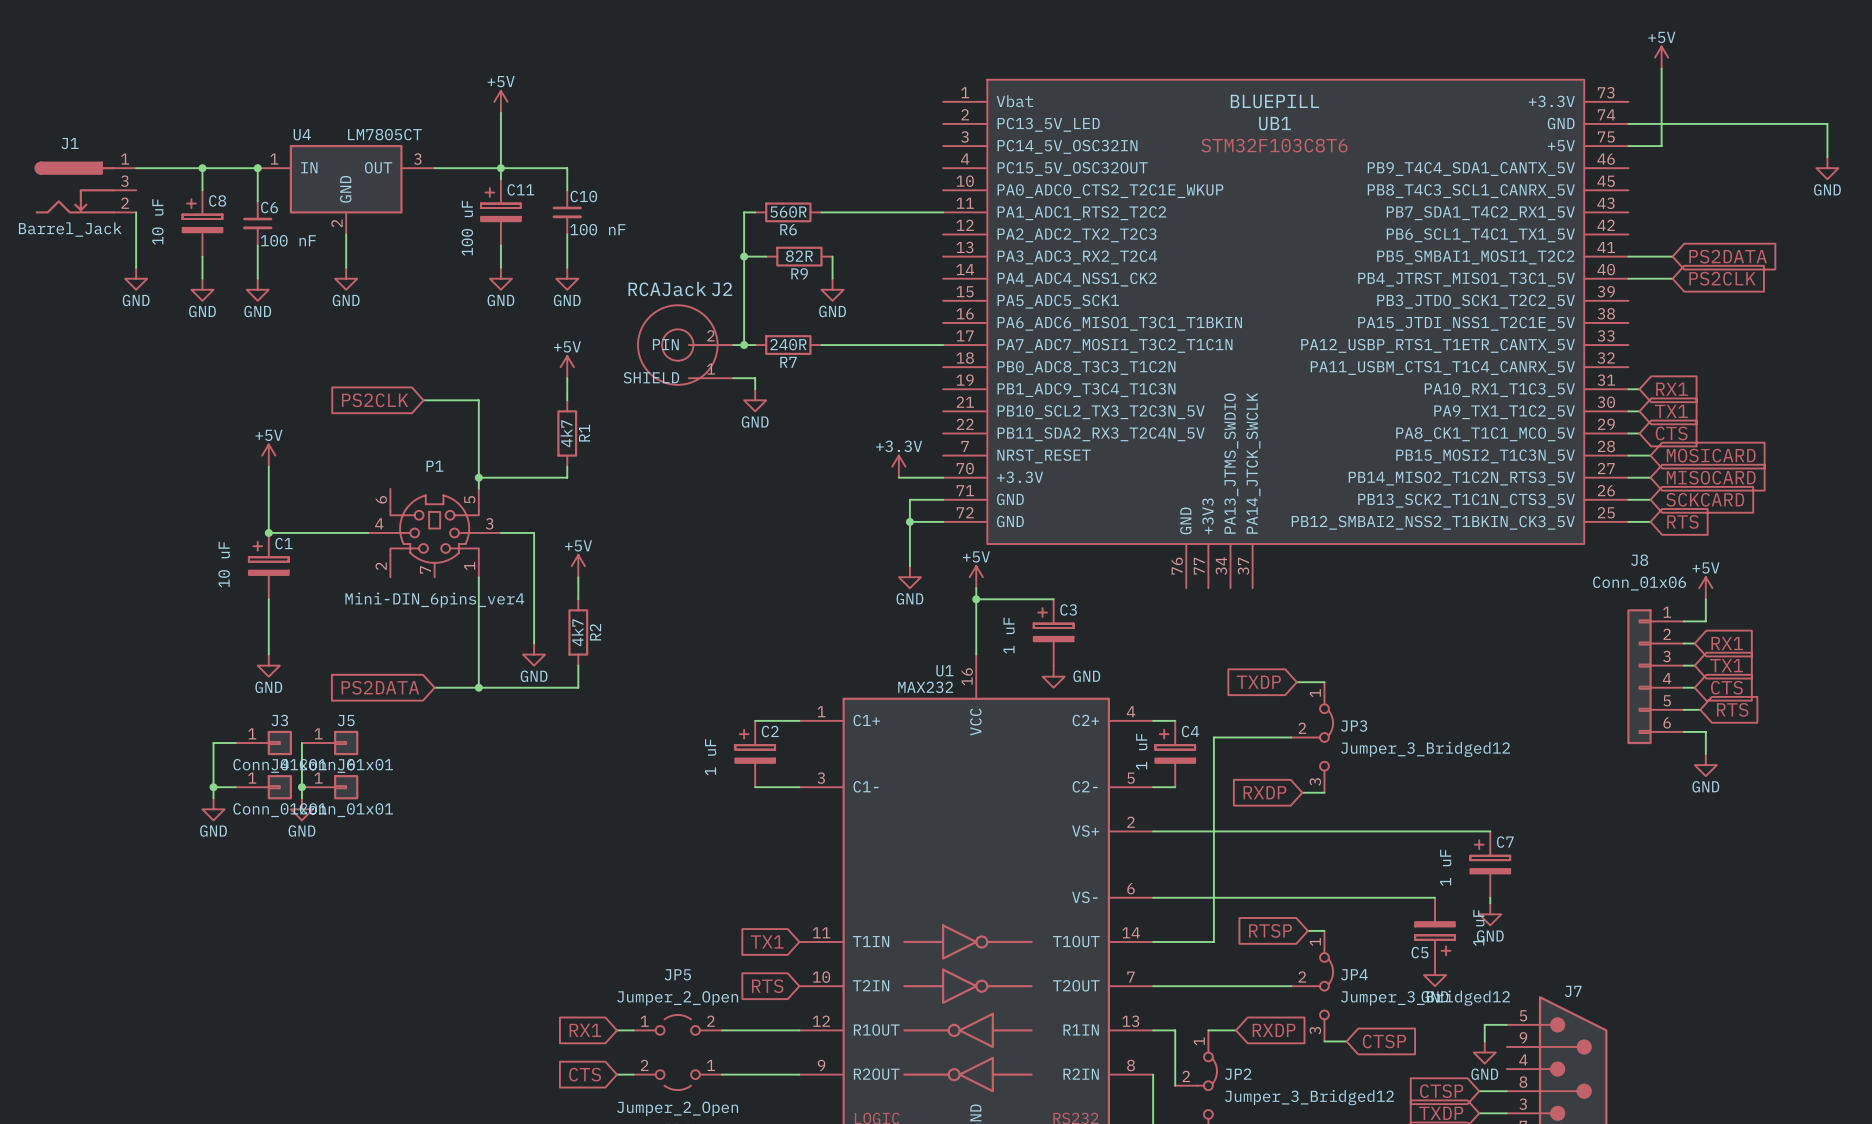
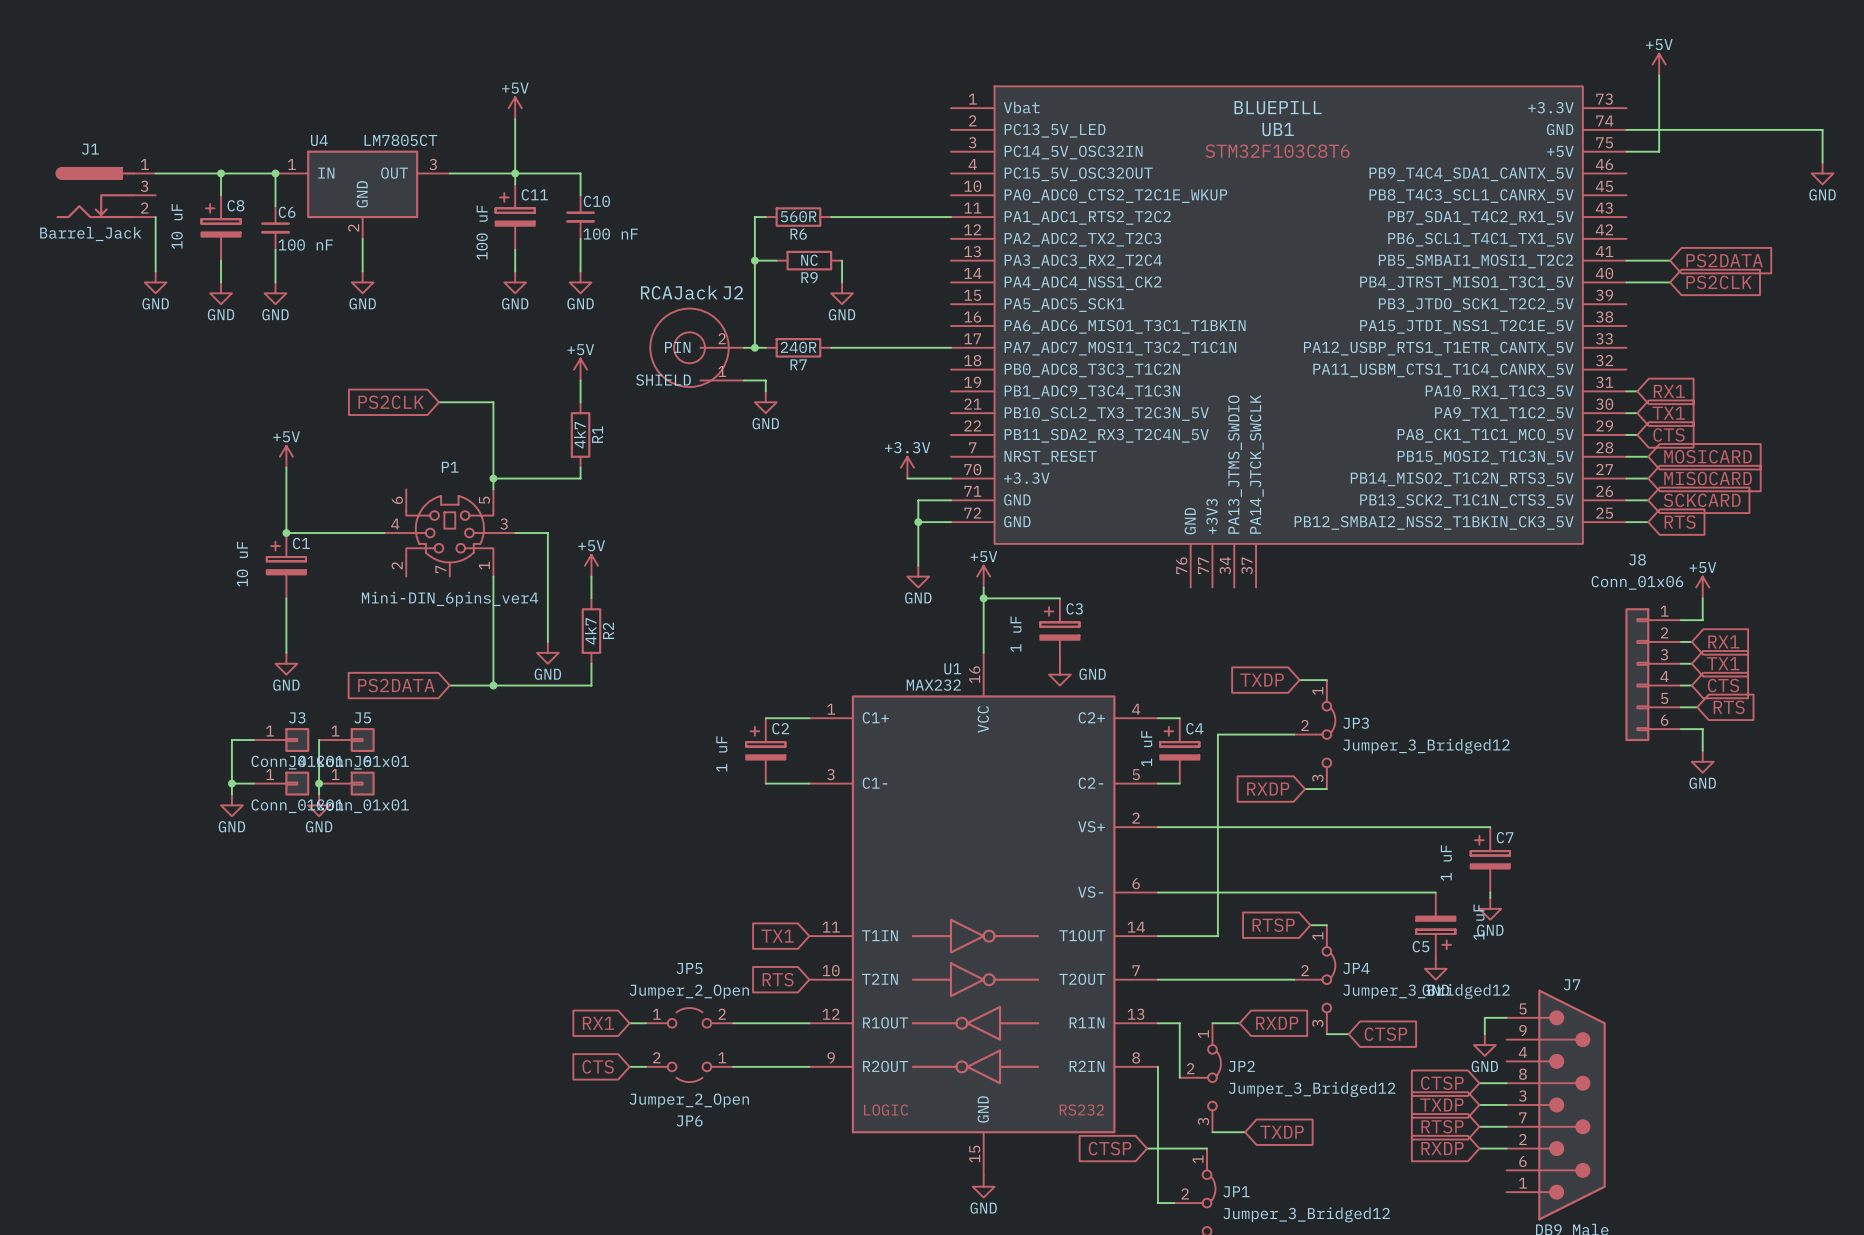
R9 value: 82R (799, 256) -> NC (809, 260)

